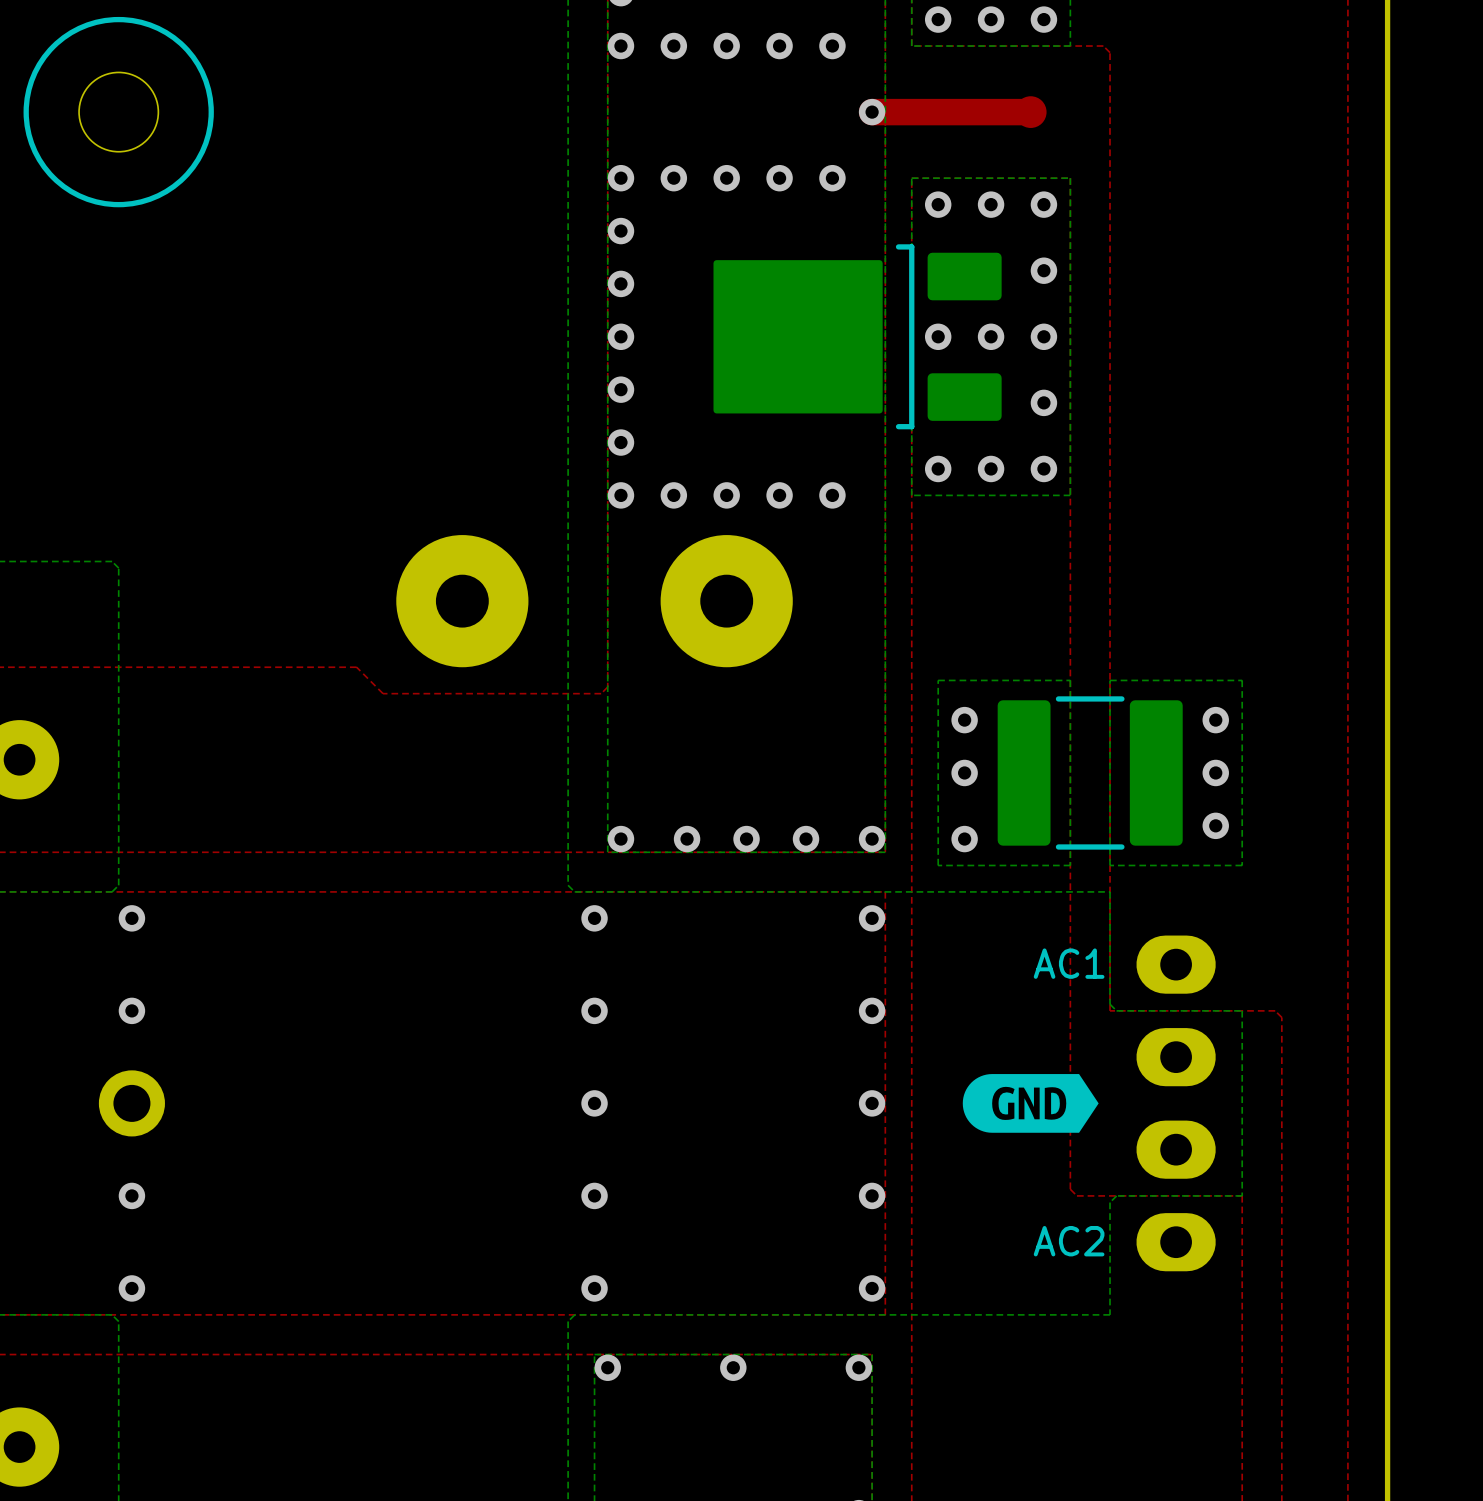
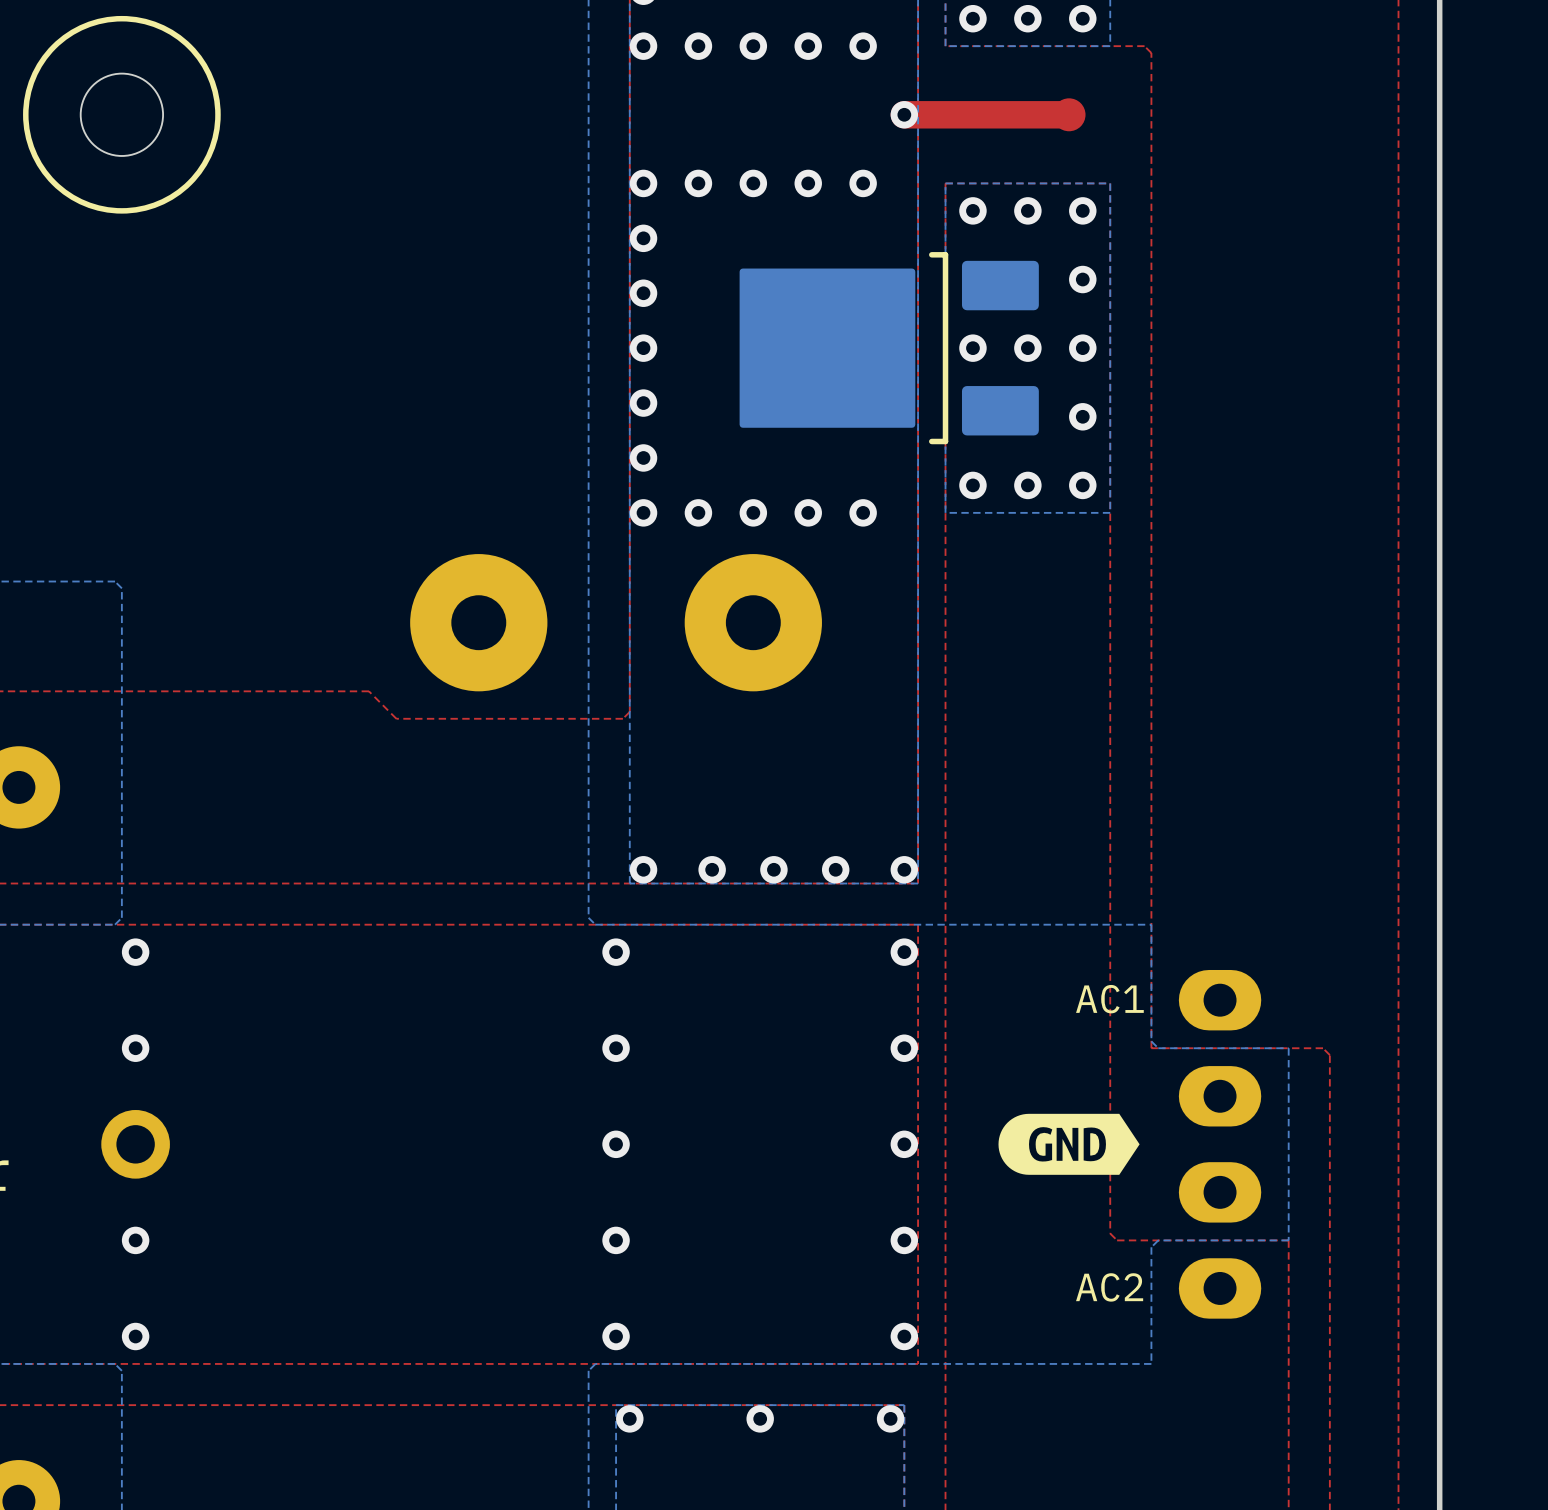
bottom zone outline: (1070, 680) (938, 680) (938, 865) (1070, 865) (1070, 680) -> none
bottom zone outline: (1242, 680) (1110, 680) (1110, 865) (1242, 865) (1242, 680) -> none
via: (964, 720) -> none
via: (1215, 720) -> none
via: (964, 772) -> none
part: (1090, 772) -> none
via: (1215, 772) -> none
via: (1215, 825) -> none
via: (964, 839) -> none

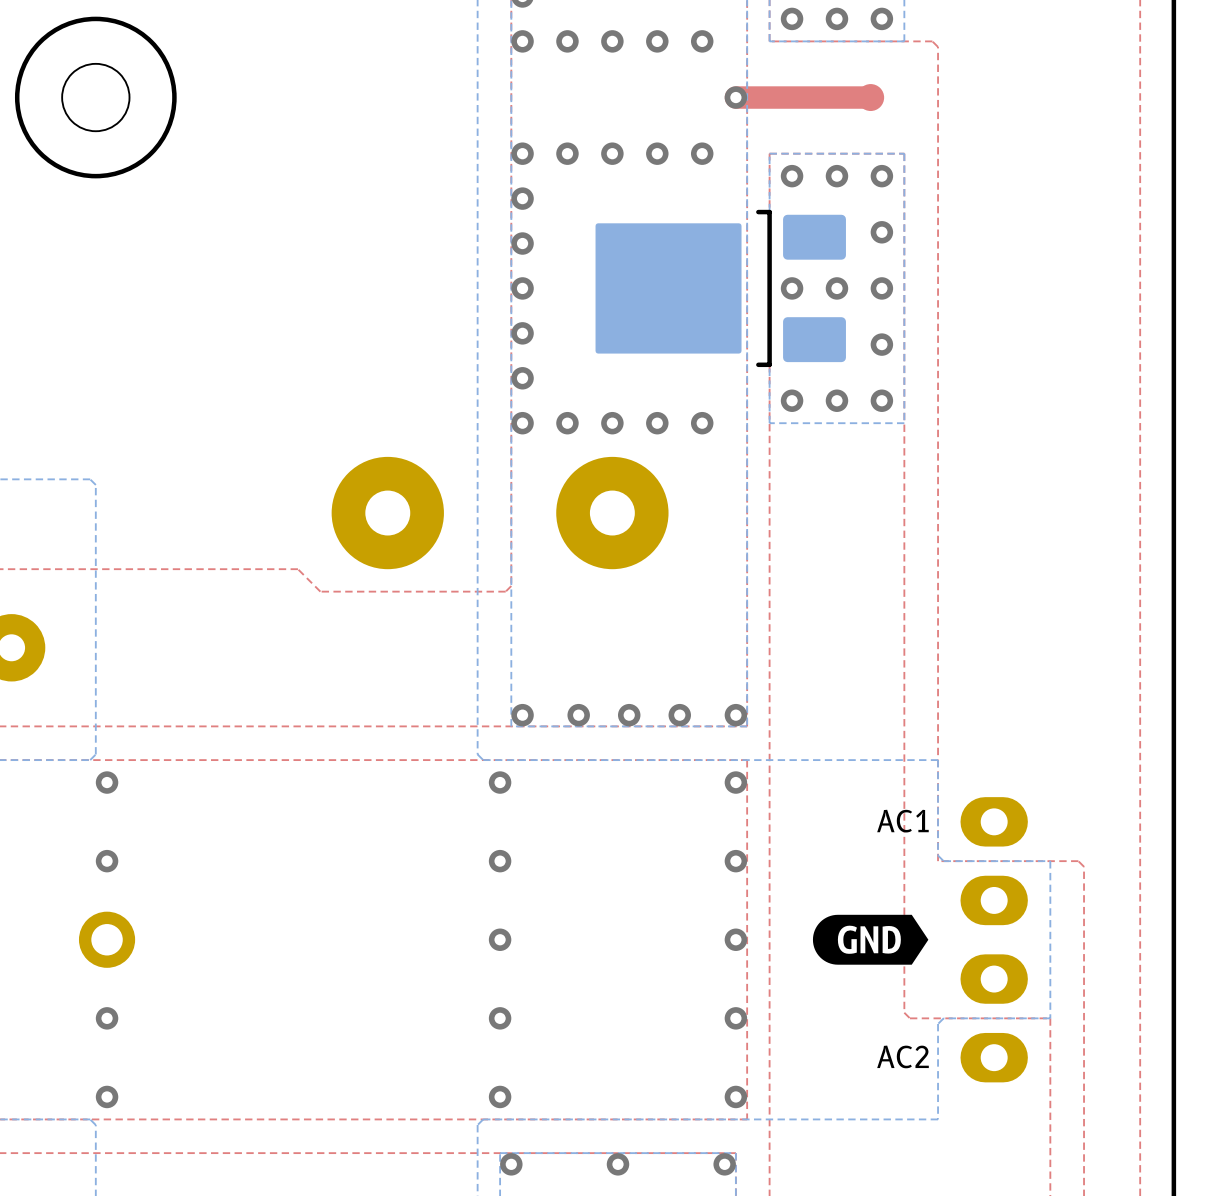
part footprint: [739, 252, 1039, 445] -> [595, 209, 846, 368]

